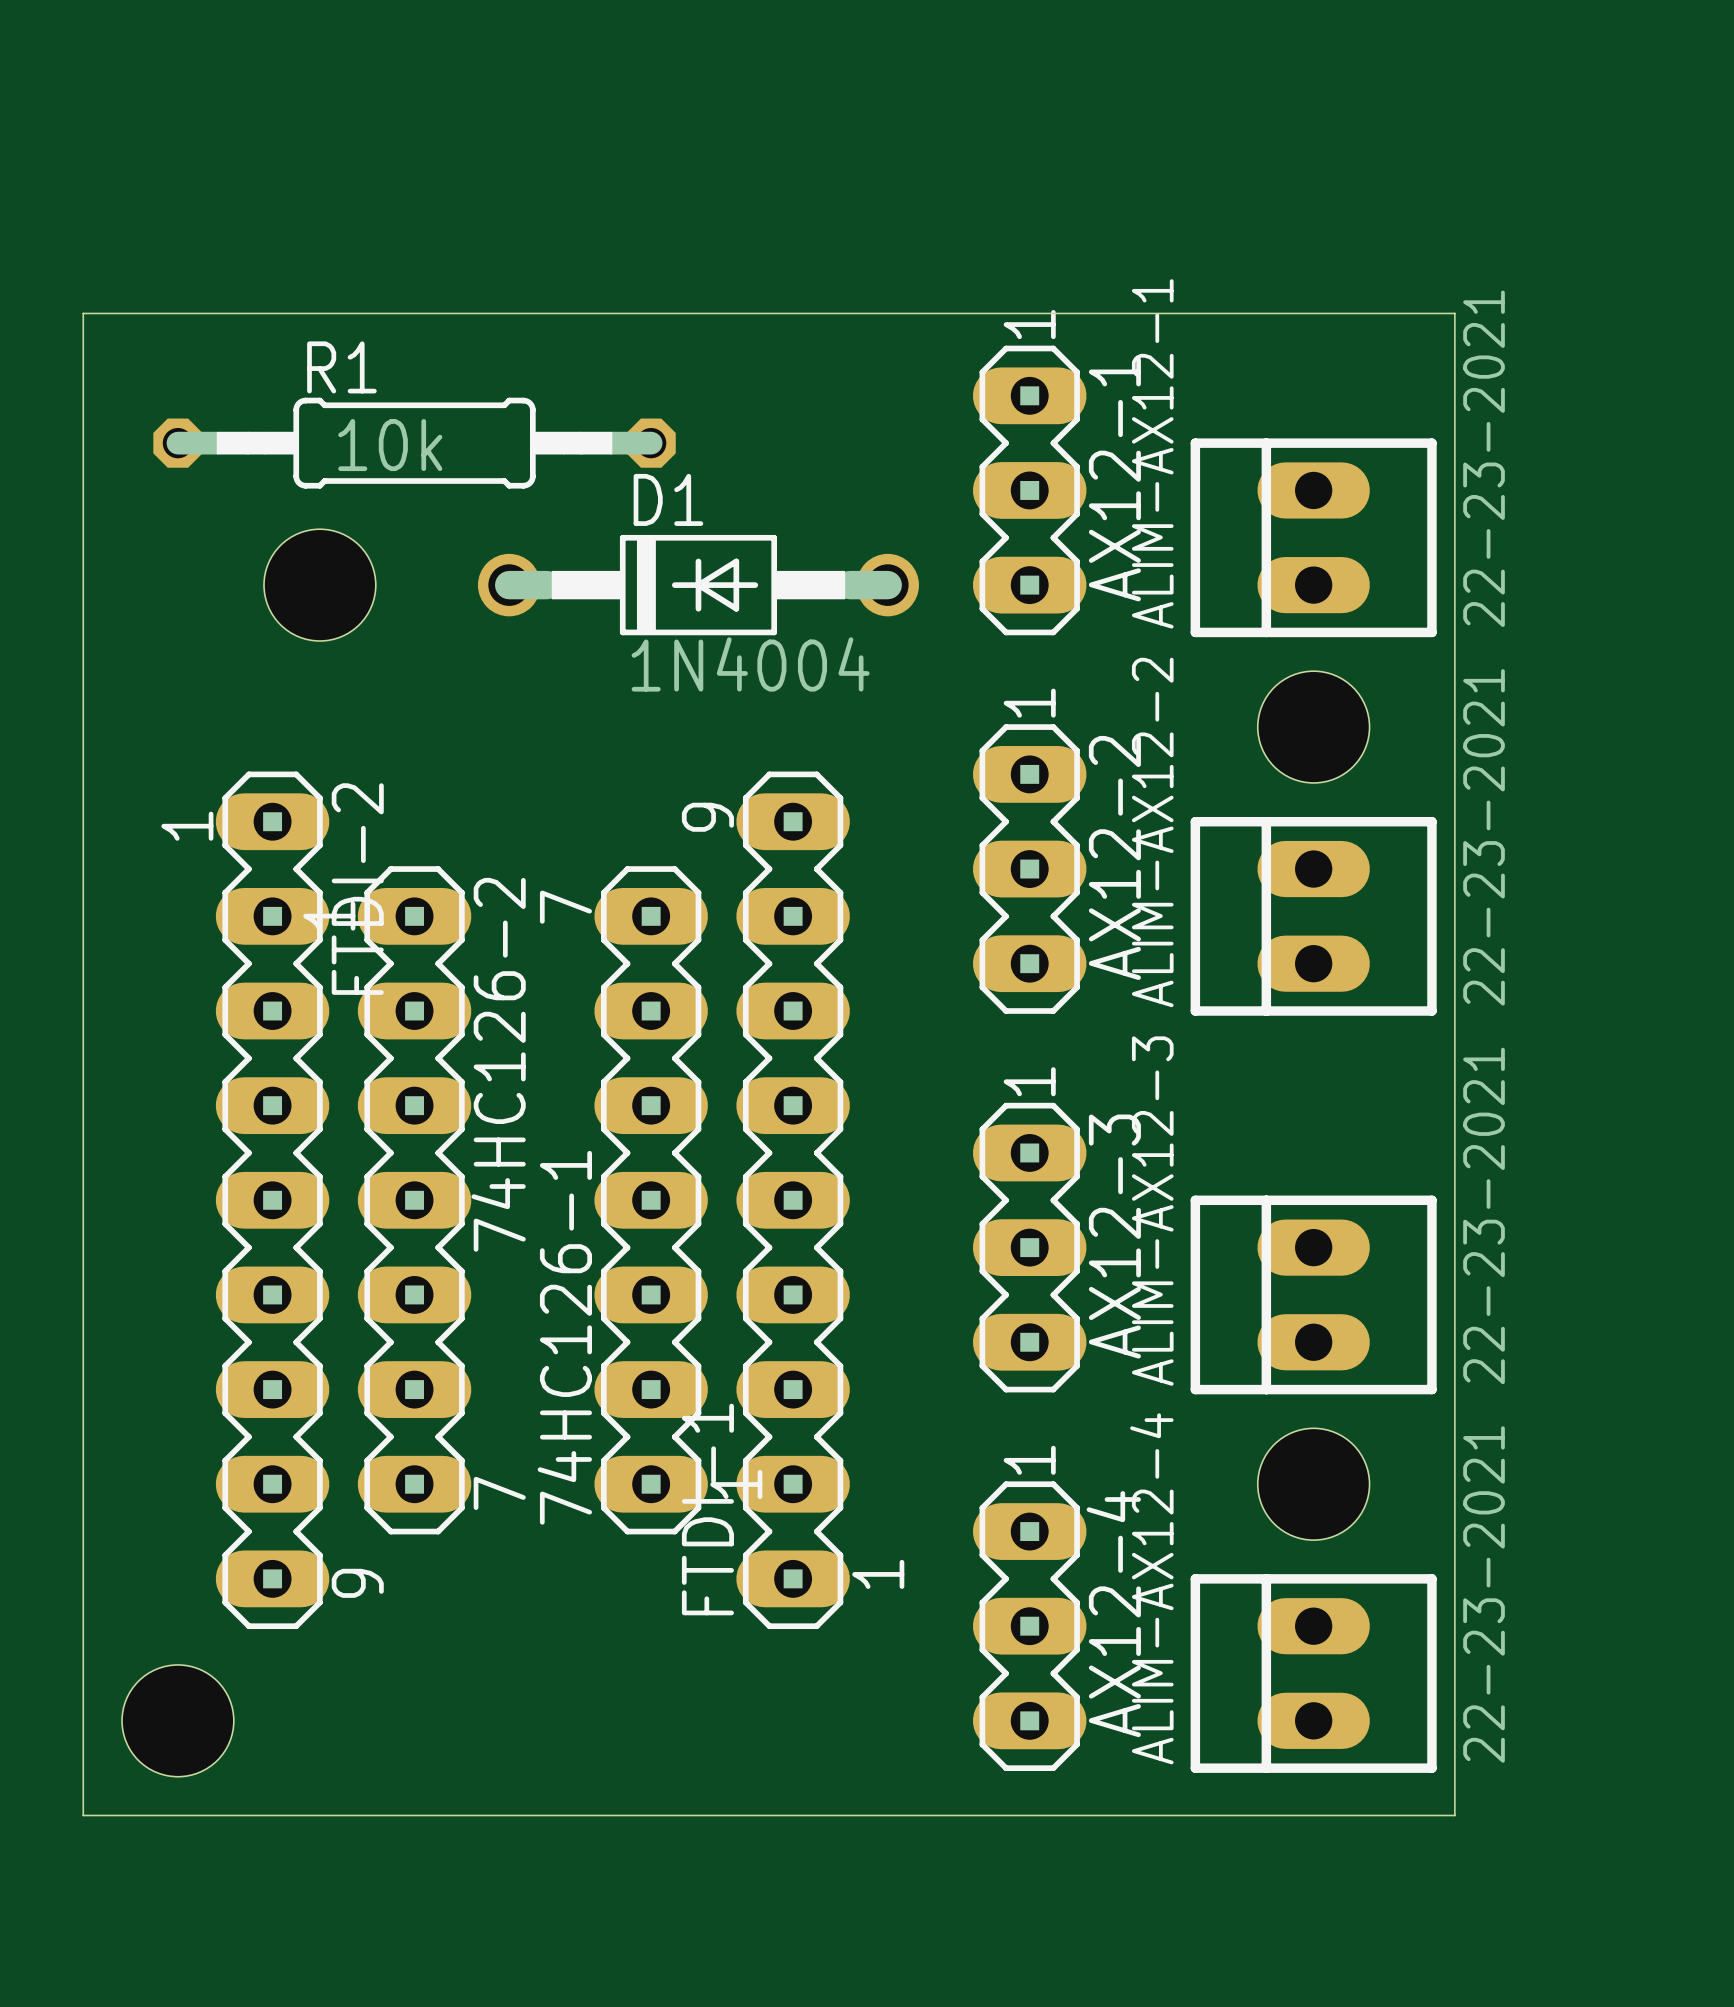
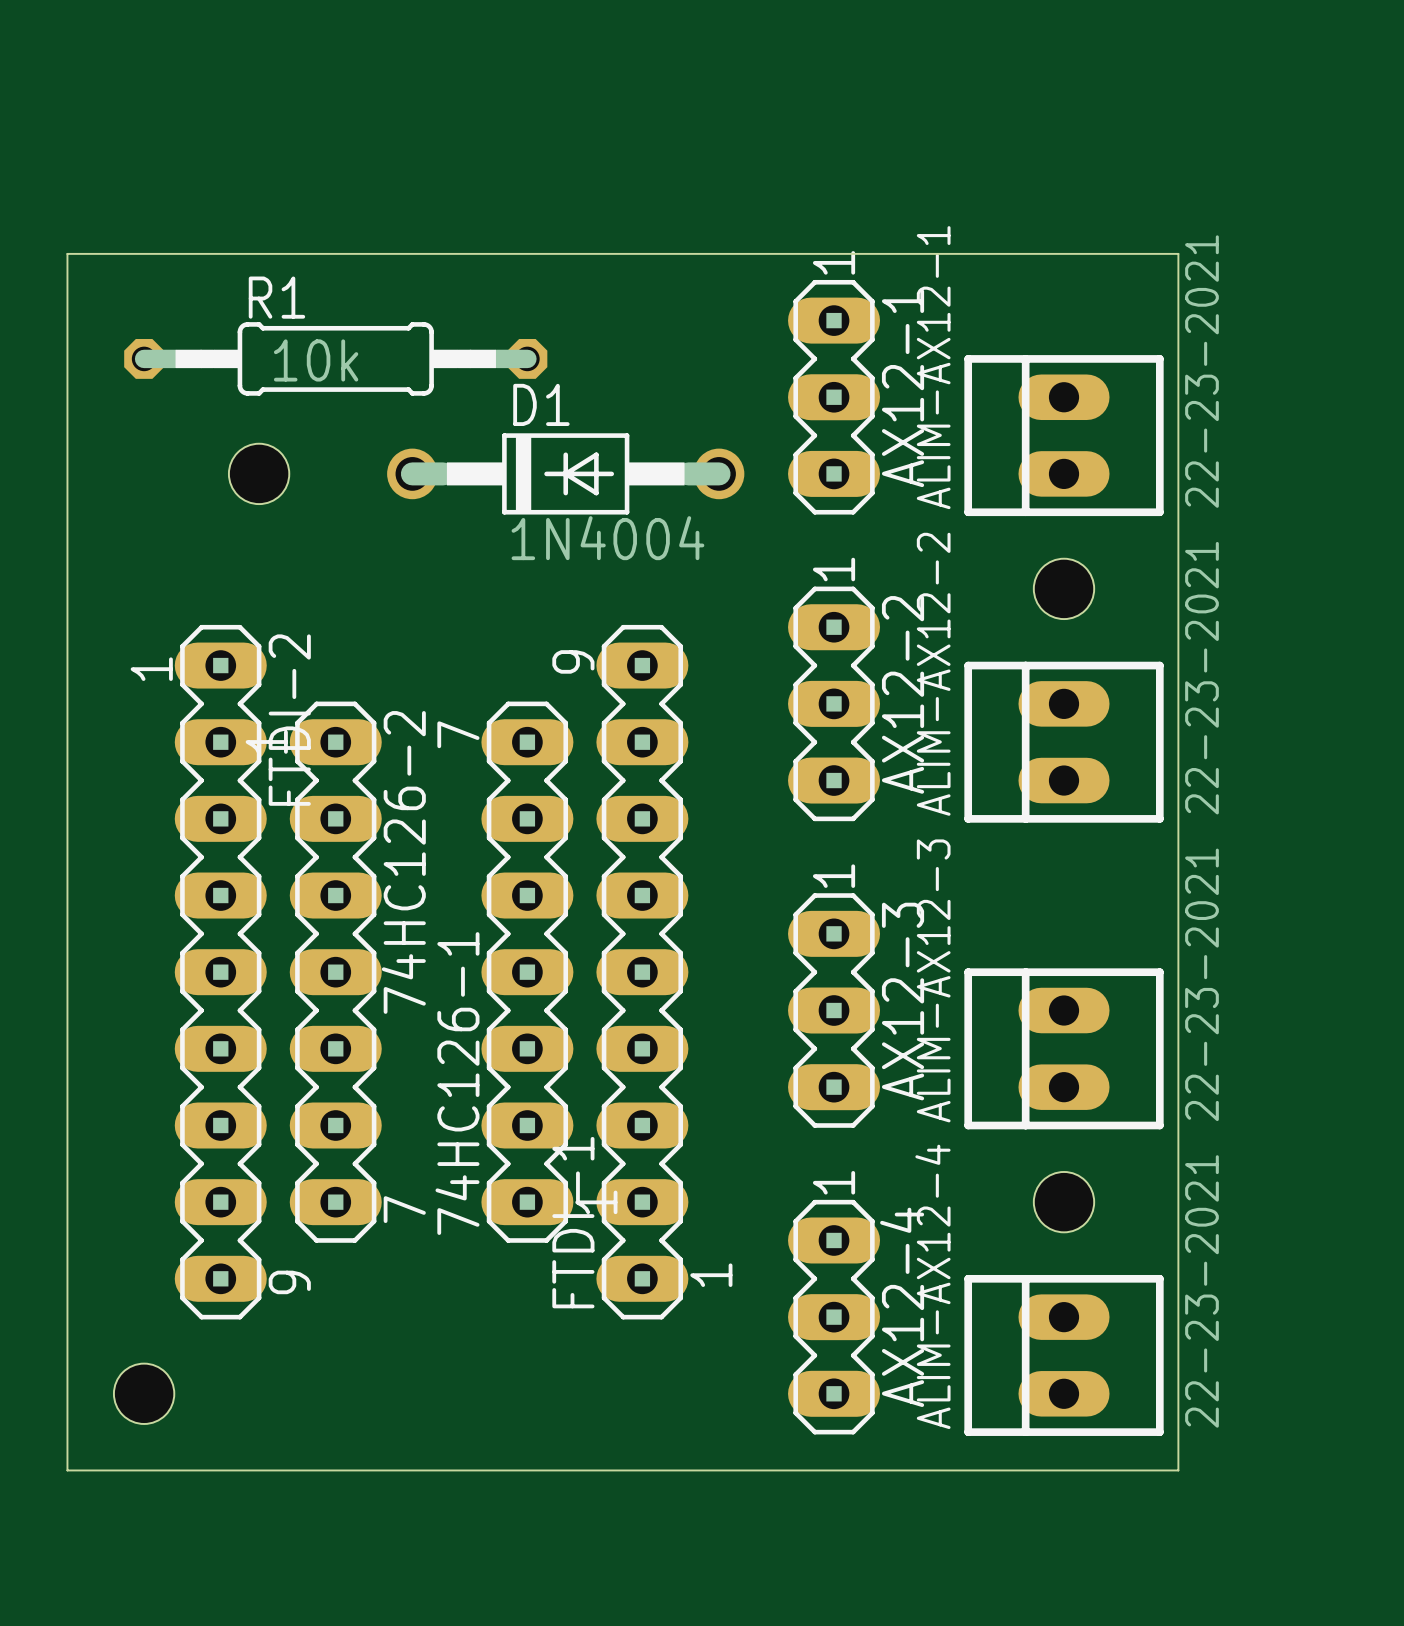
hole size: [264, 529, 376, 642] -> [228, 443, 290, 505]
hole size: [1257, 671, 1370, 783] -> [1033, 558, 1095, 620]
hole size: [1257, 1428, 1370, 1541] -> [1033, 1171, 1095, 1233]
hole size: [122, 1664, 234, 1777] -> [113, 1363, 175, 1424]

